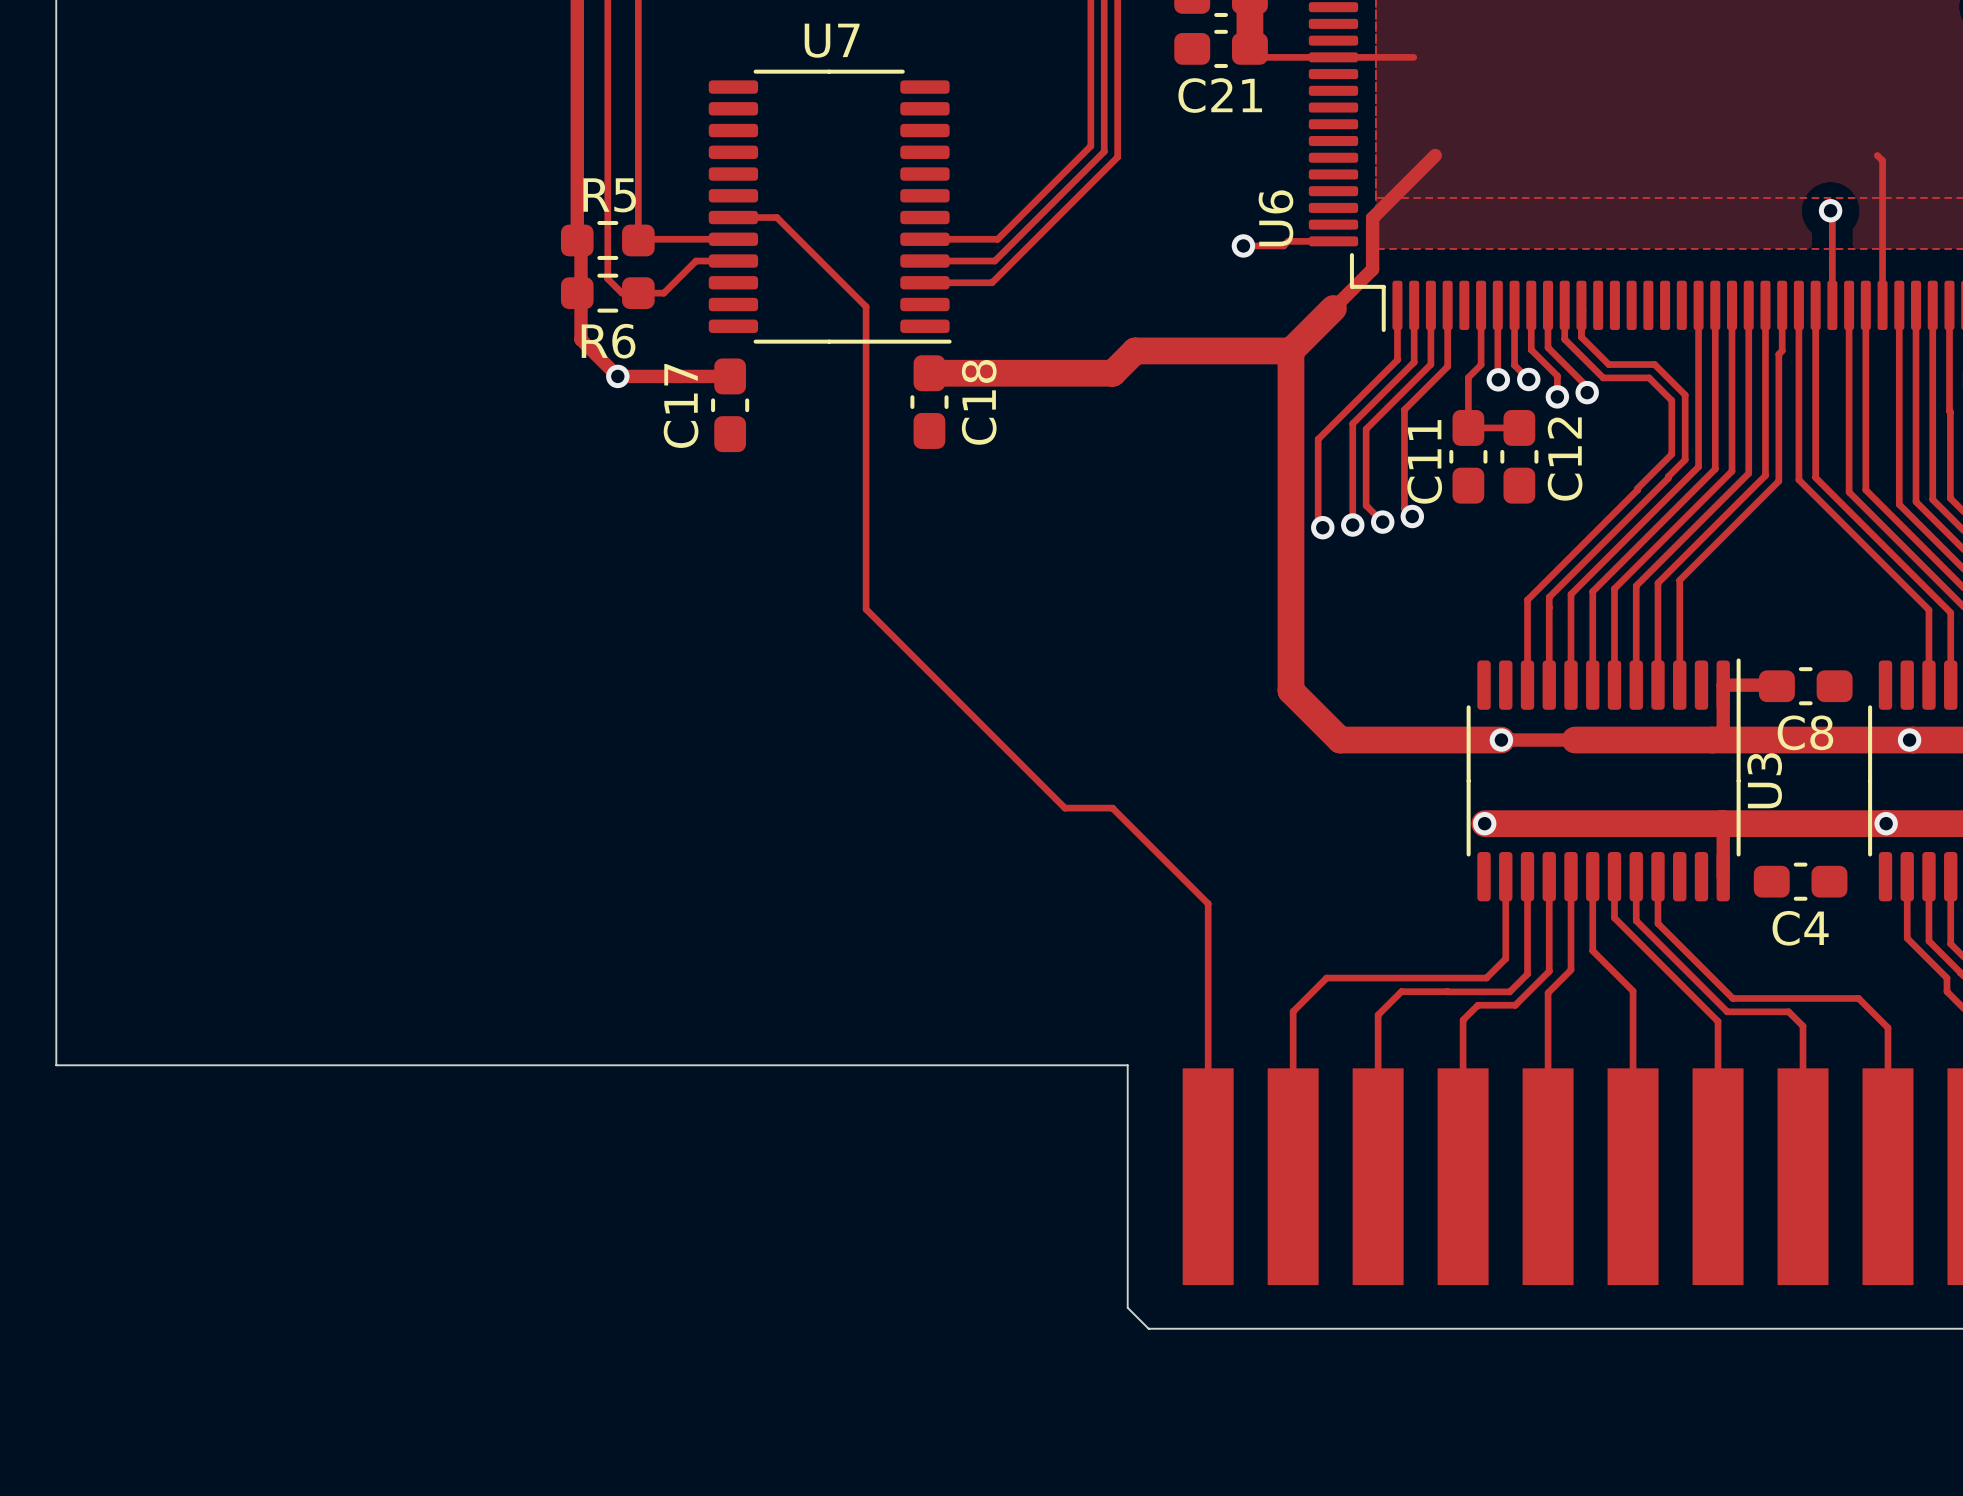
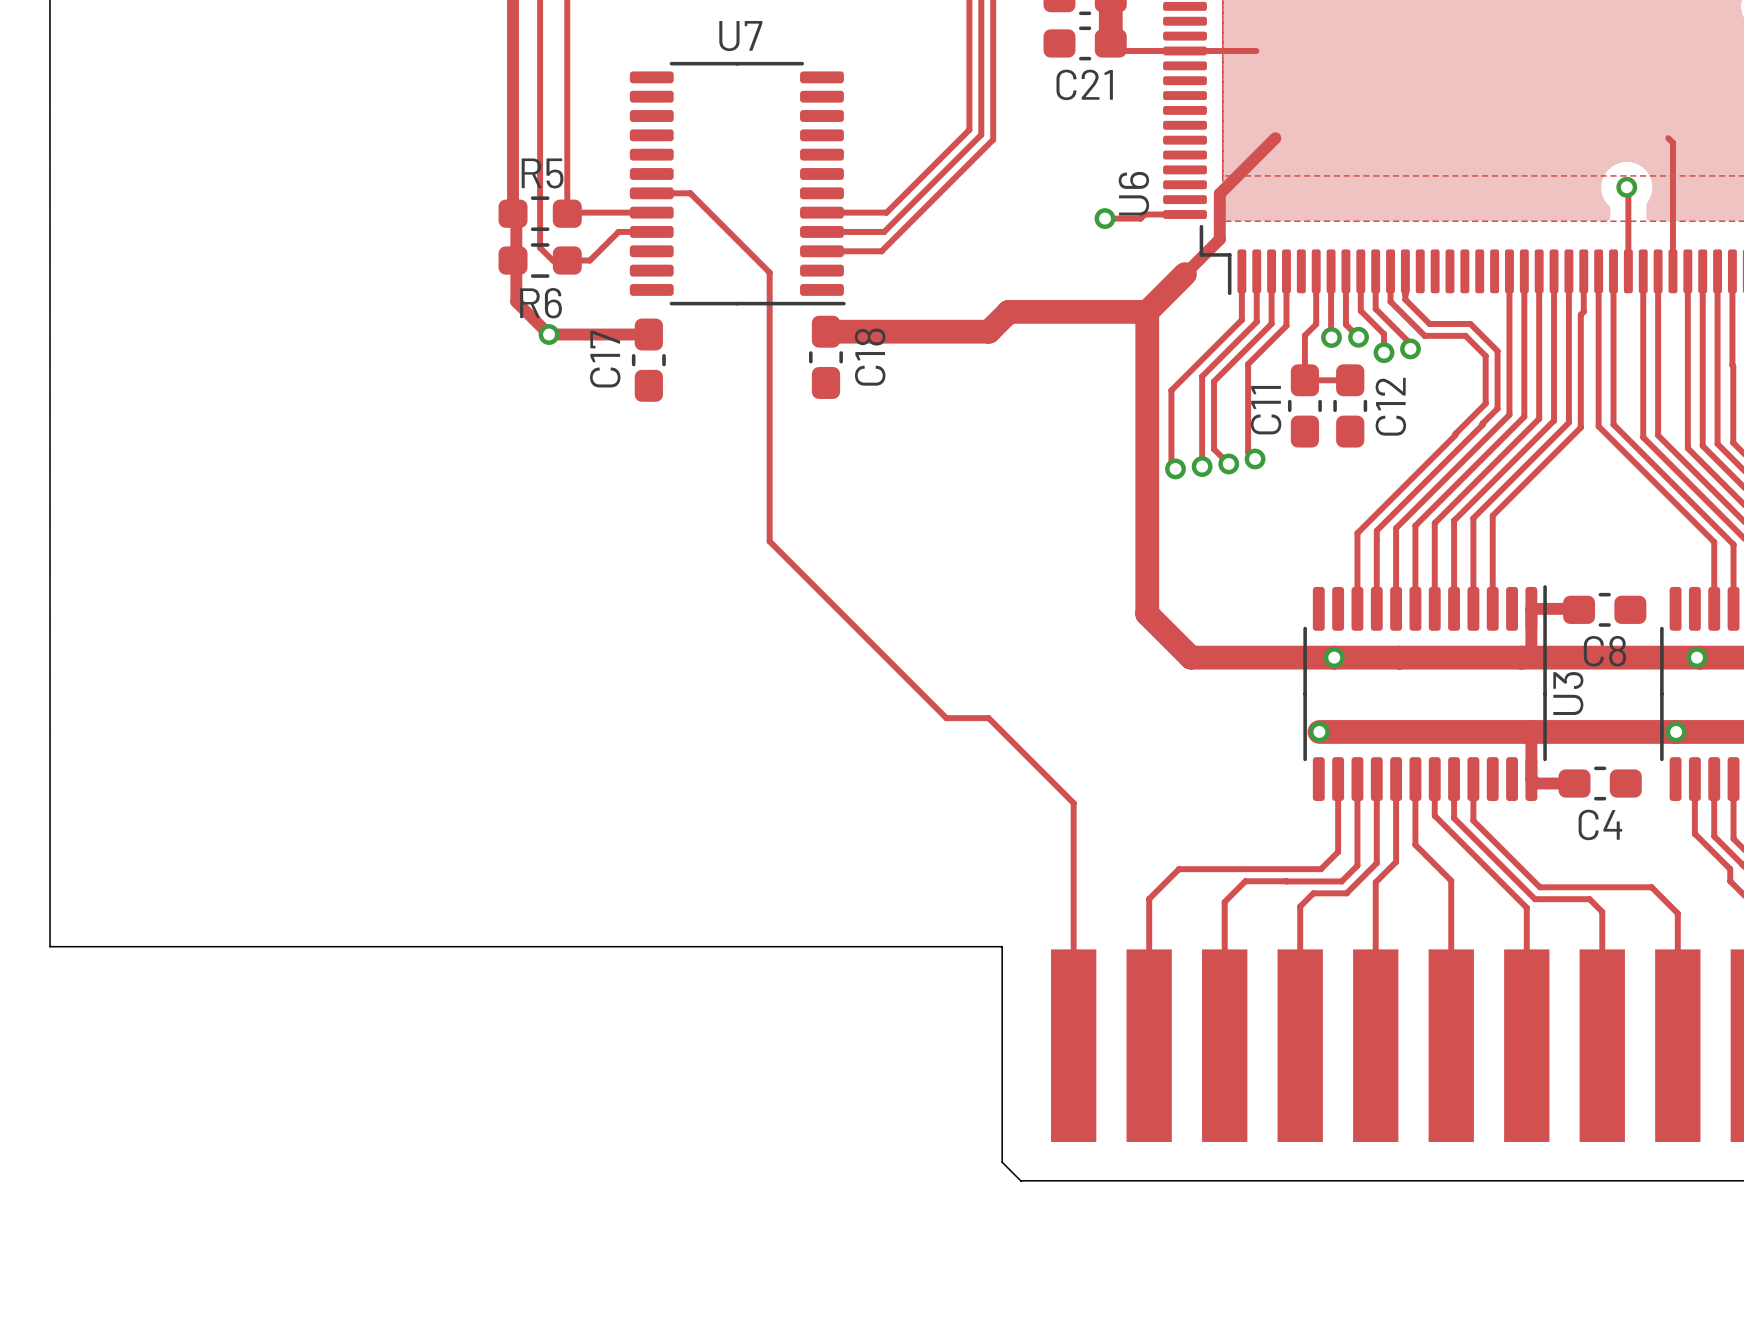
track width: thin (1501, 740) (1575, 740) -> thick (1334, 657) (1399, 657)
track: none -> (1531, 779) (1535, 783) (1574, 783)

